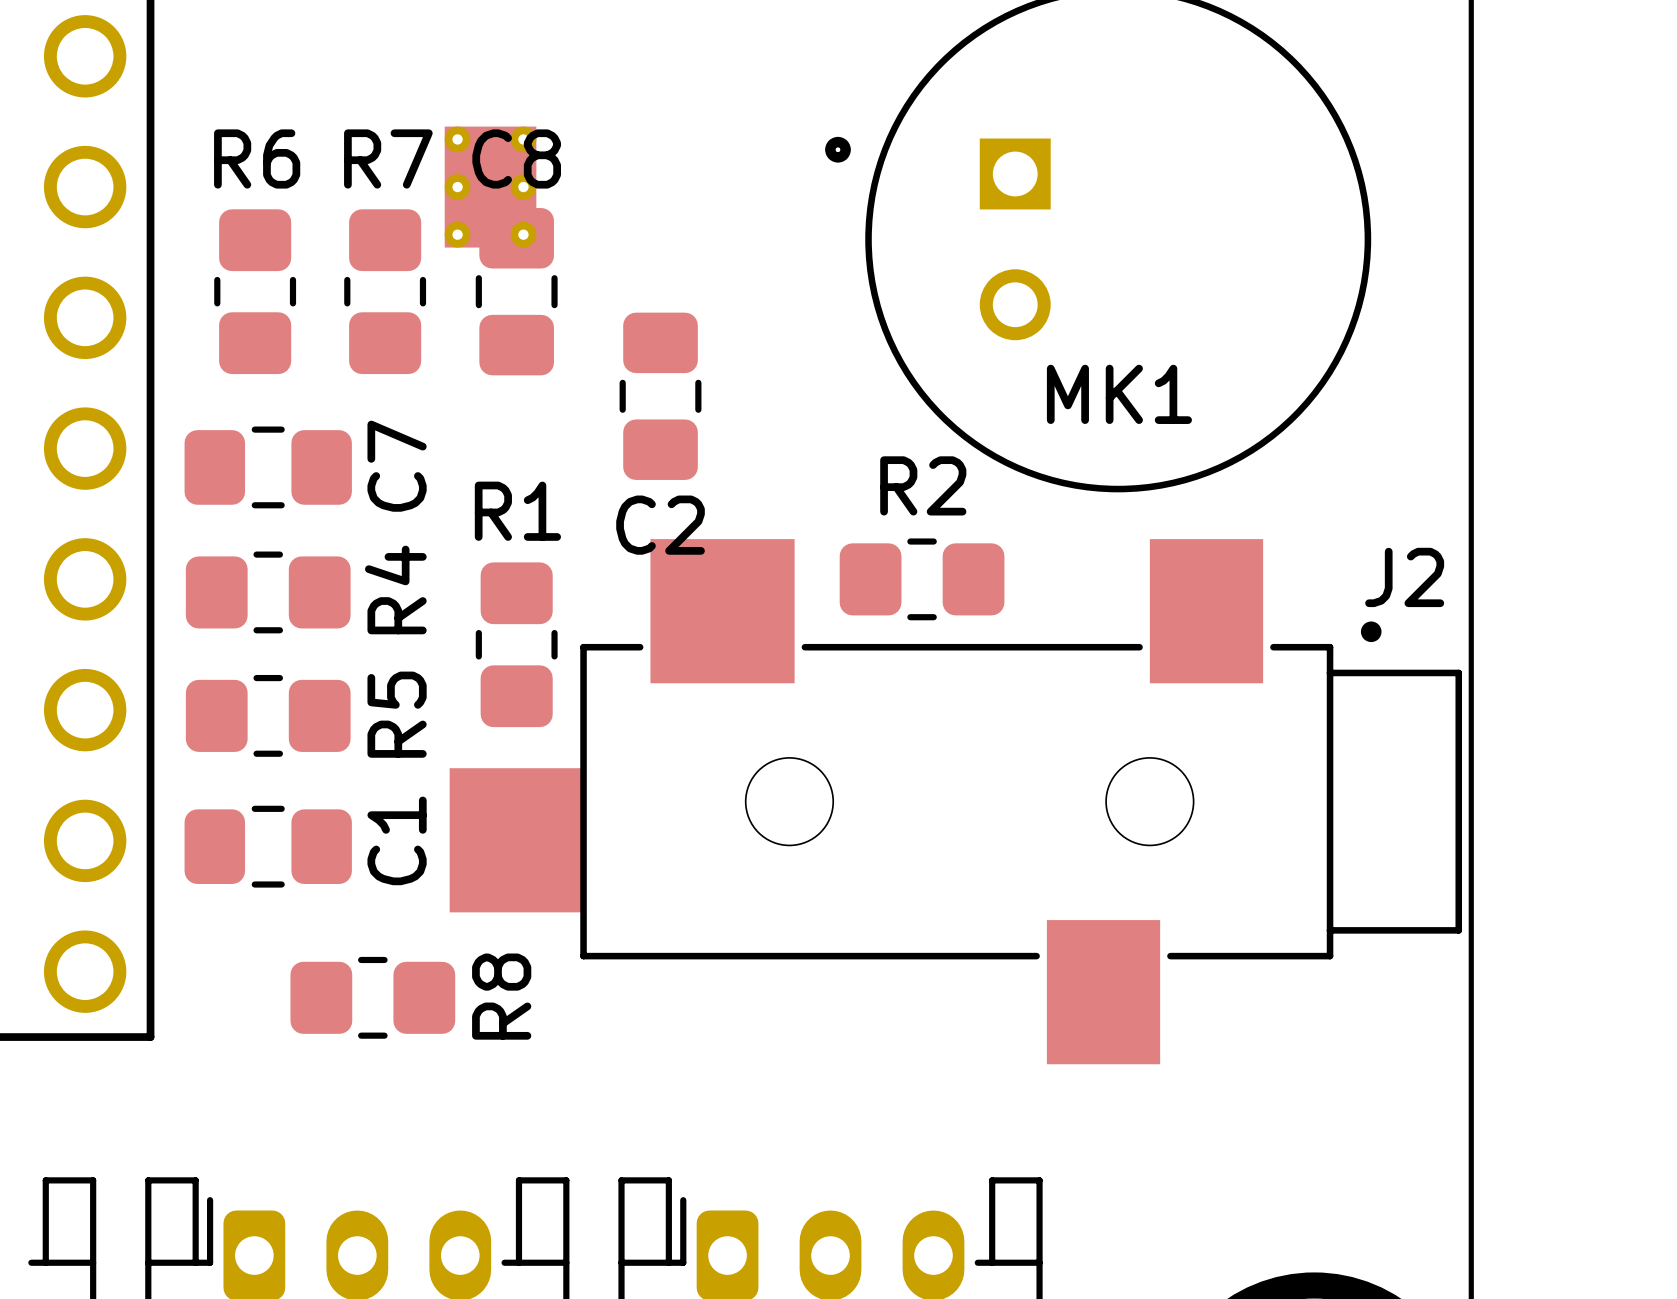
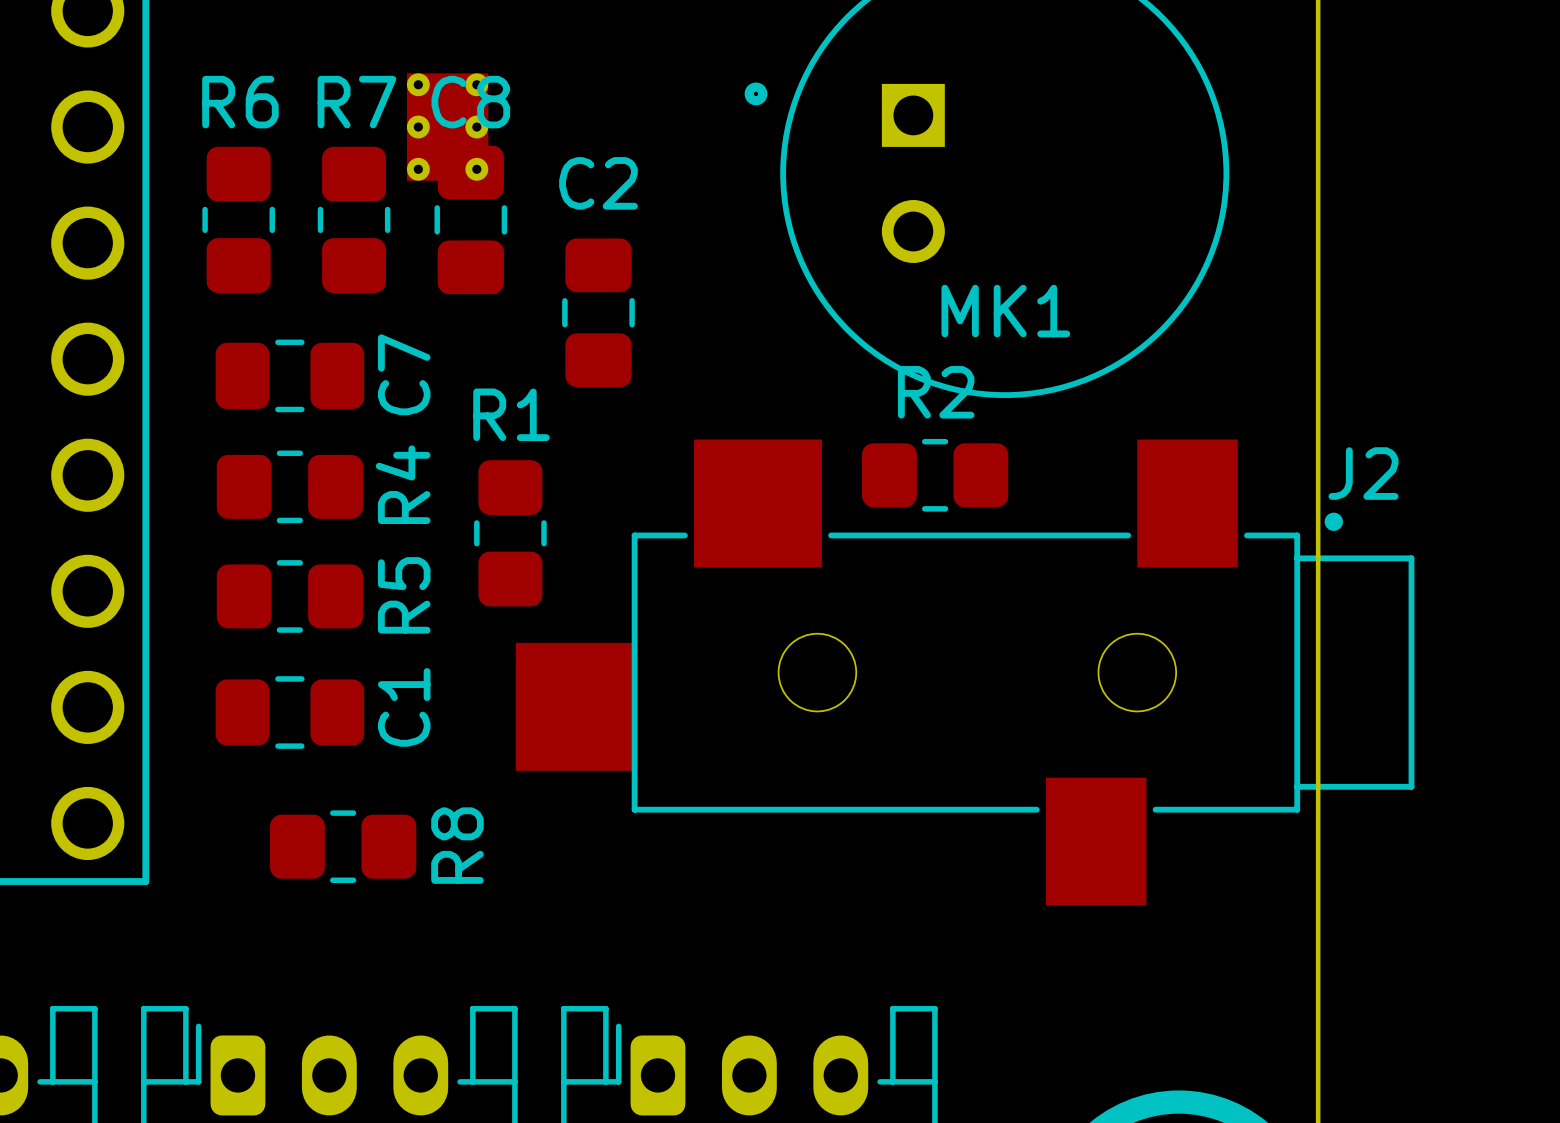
C7 position: (268, 467) -> (289, 375)
C2 name position: C2 (660, 525) -> C2 (598, 183)
R2 position: (922, 579) -> (935, 475)
R4 position: (268, 592) -> (289, 486)
R1 position: (516, 644) -> (510, 533)
R5 position: (268, 715) -> (289, 596)
J2 position: (955, 801) -> (965, 672)
C1 position: (268, 846) -> (289, 712)

